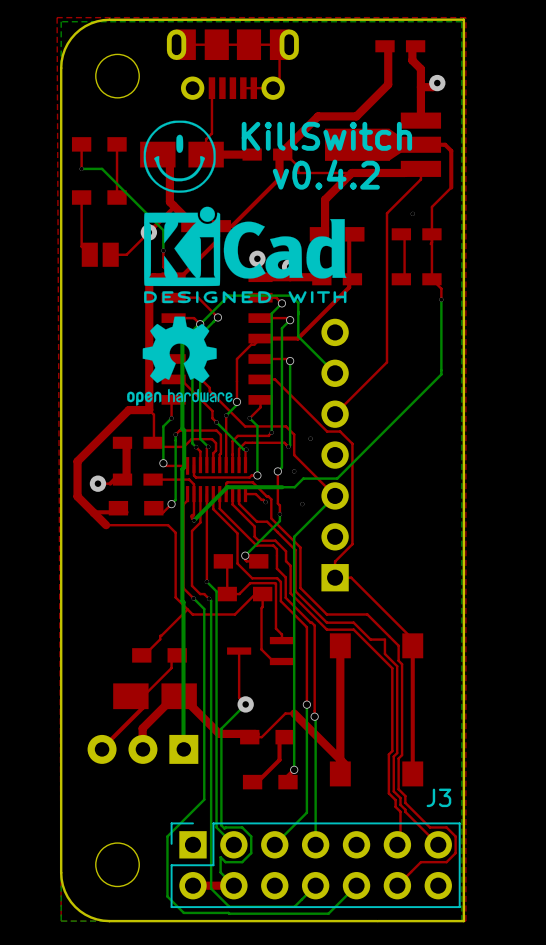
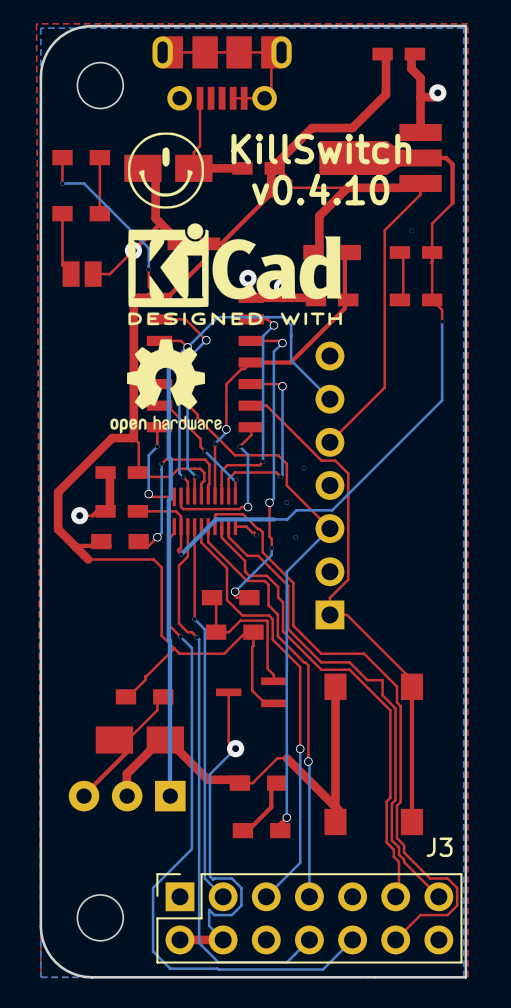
text: v0.4.2 (326, 174) -> v0.4.10 (320, 189)

